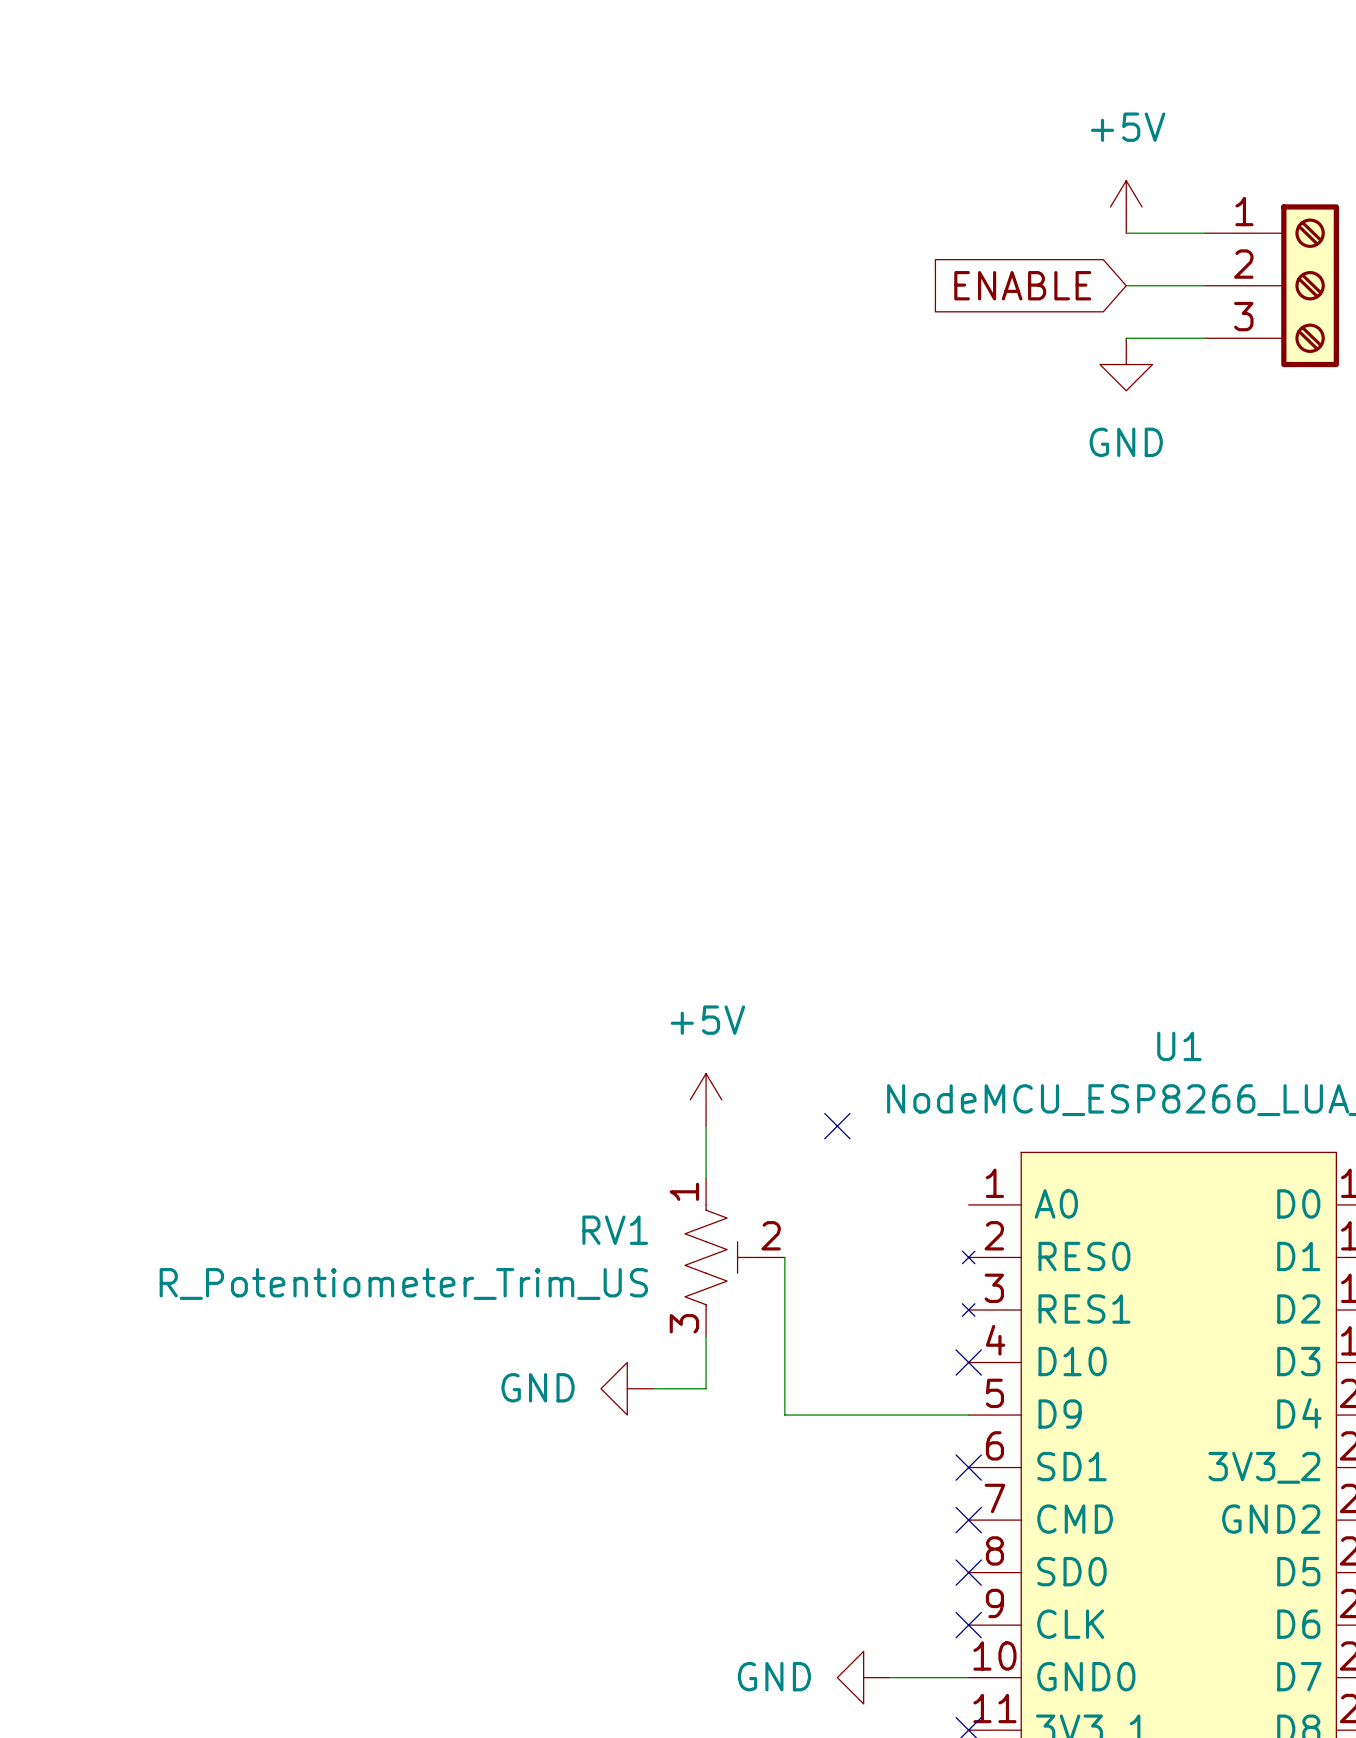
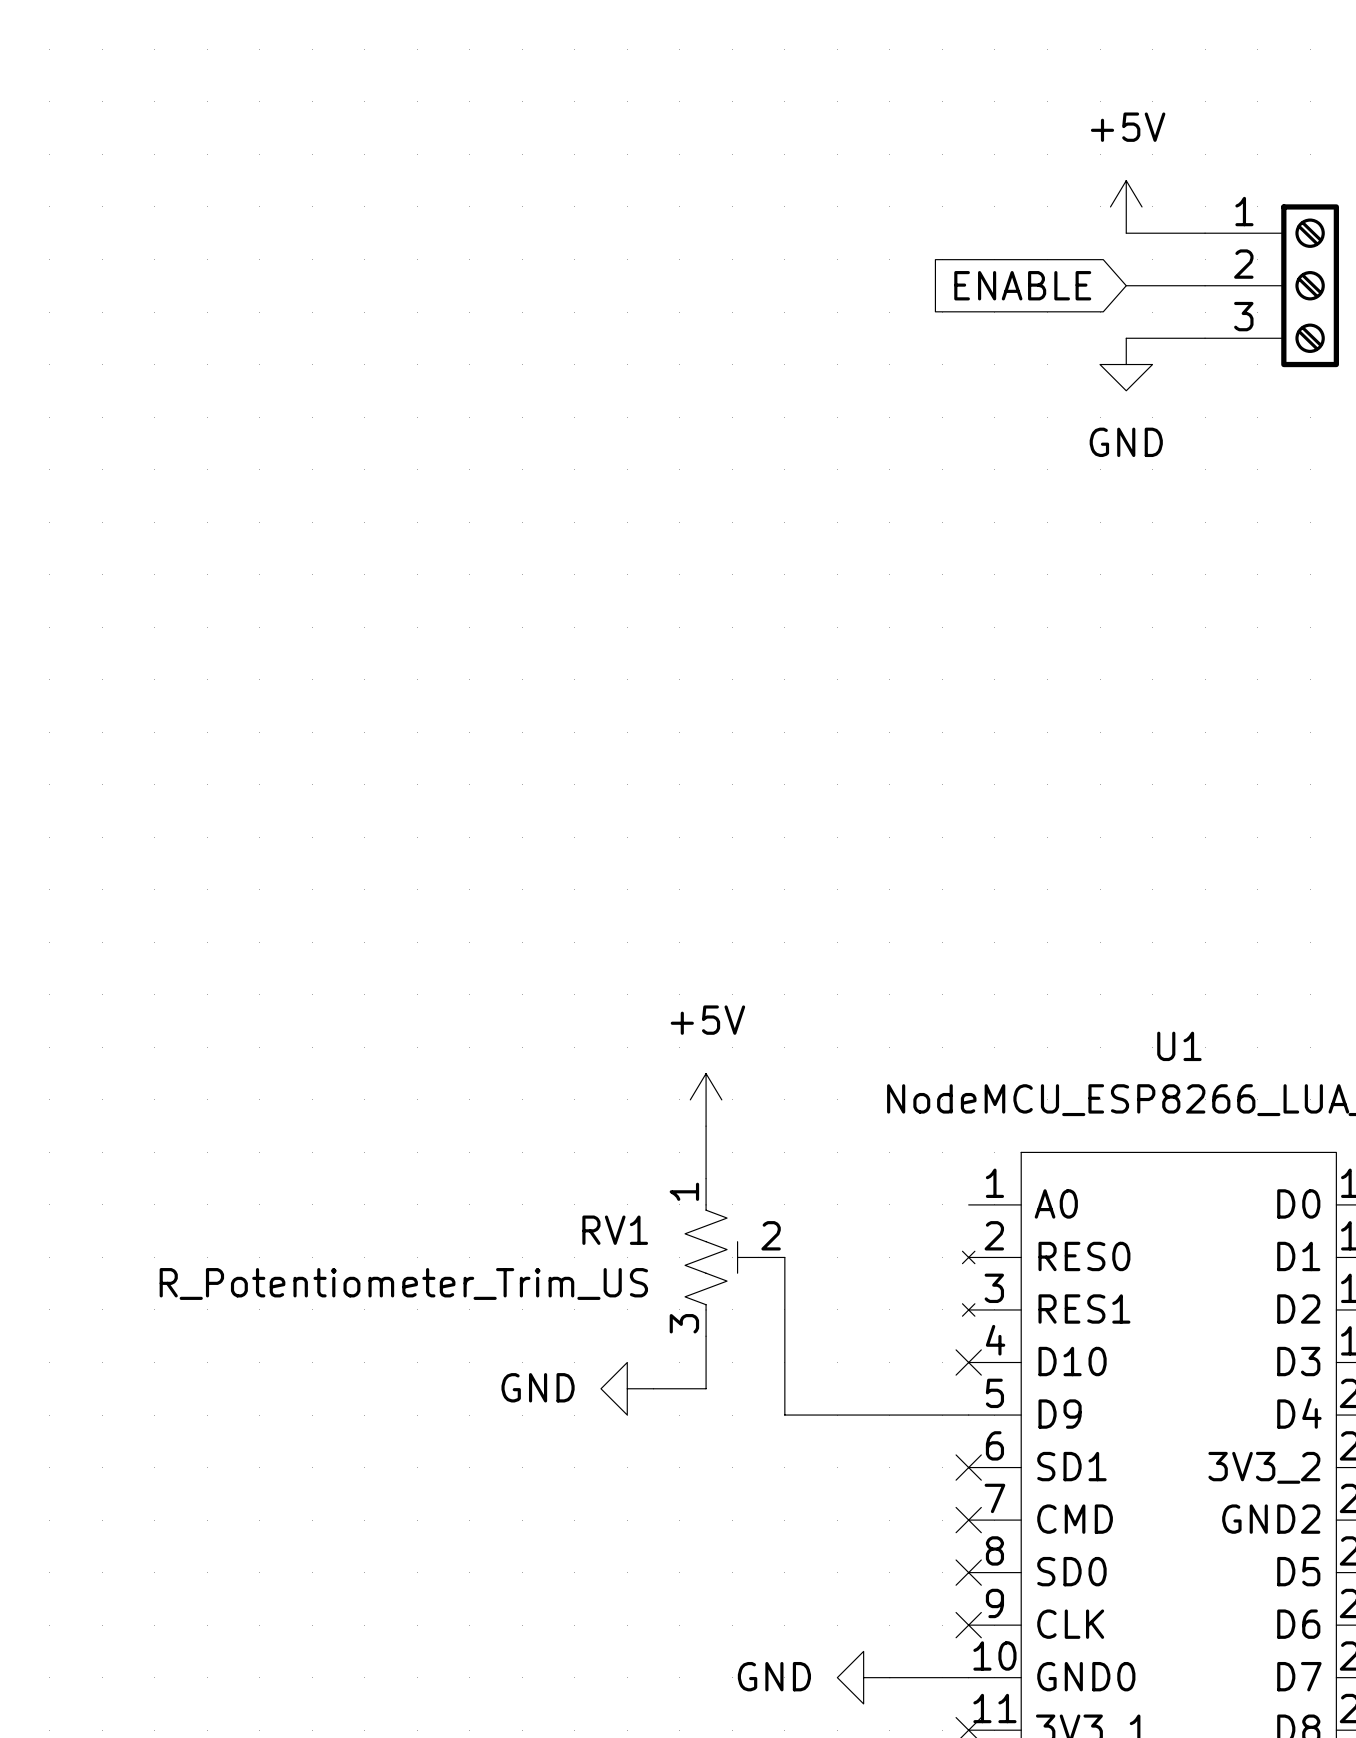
no-connect mark: (837, 1126) -> none

